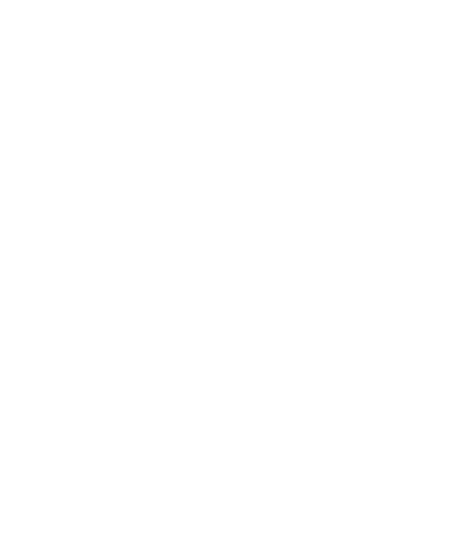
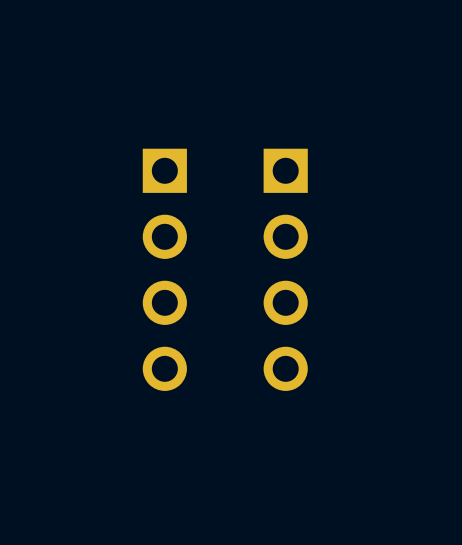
part: none -> (164, 269)
part: none -> (285, 269)

